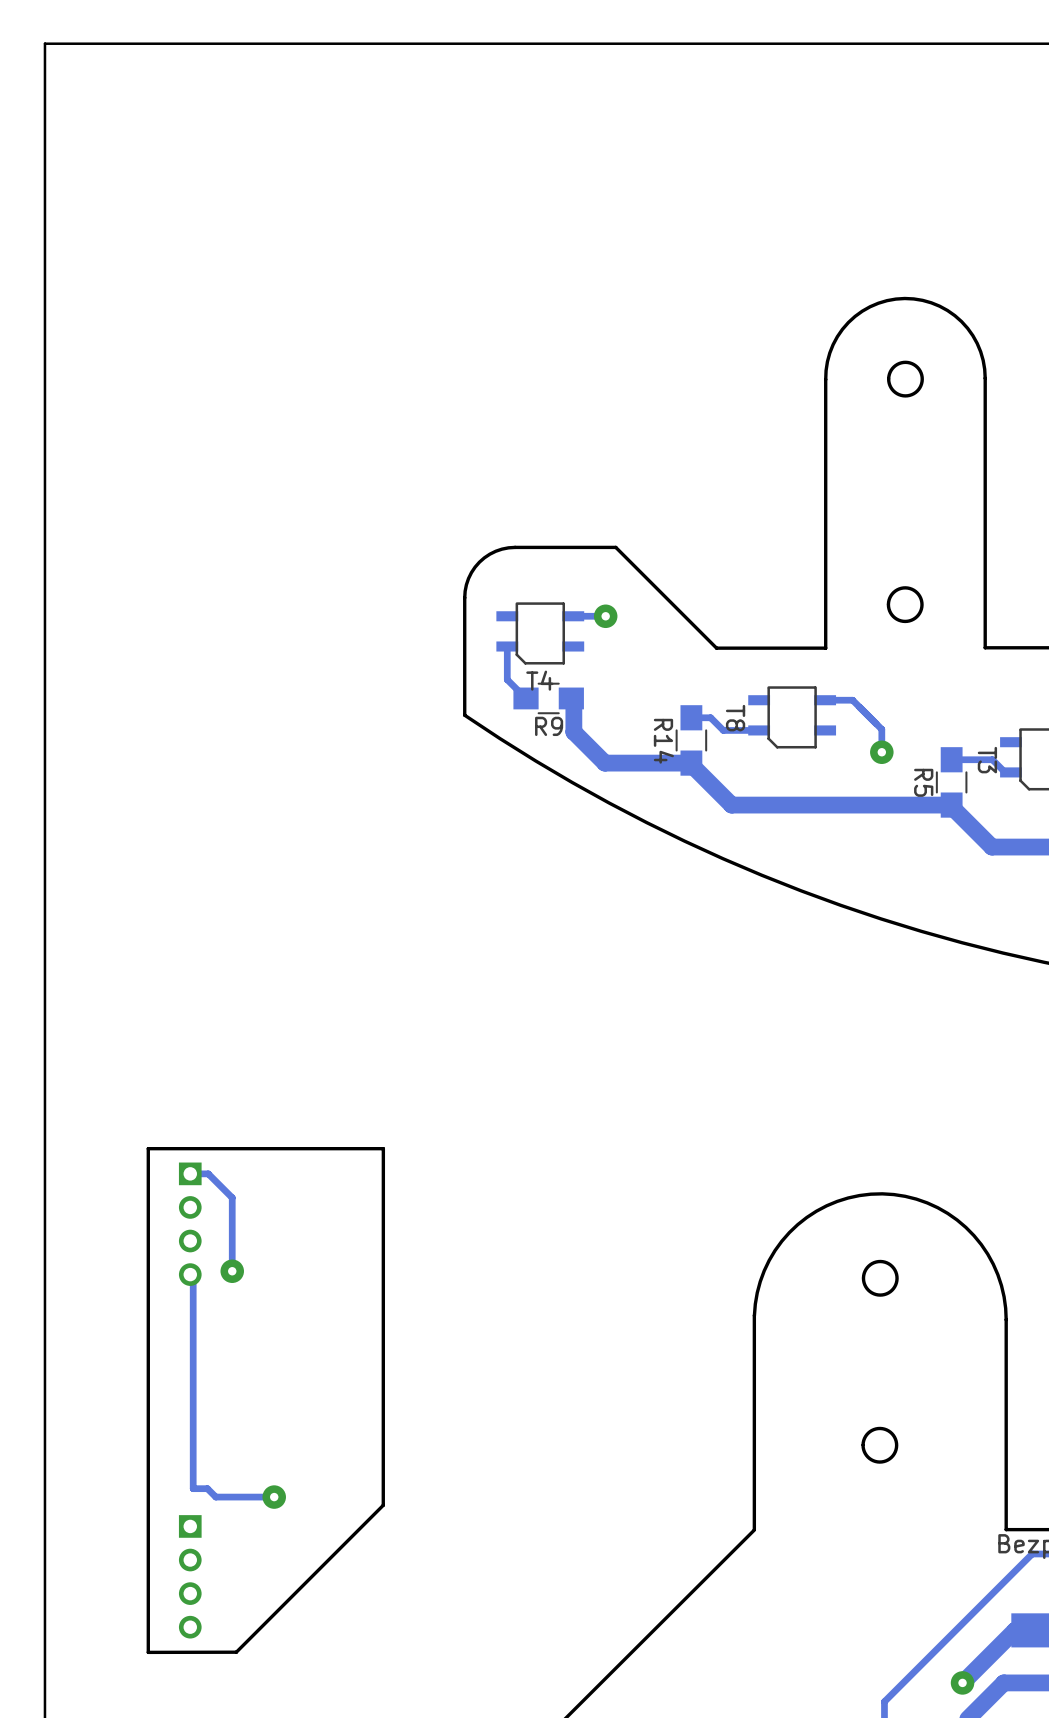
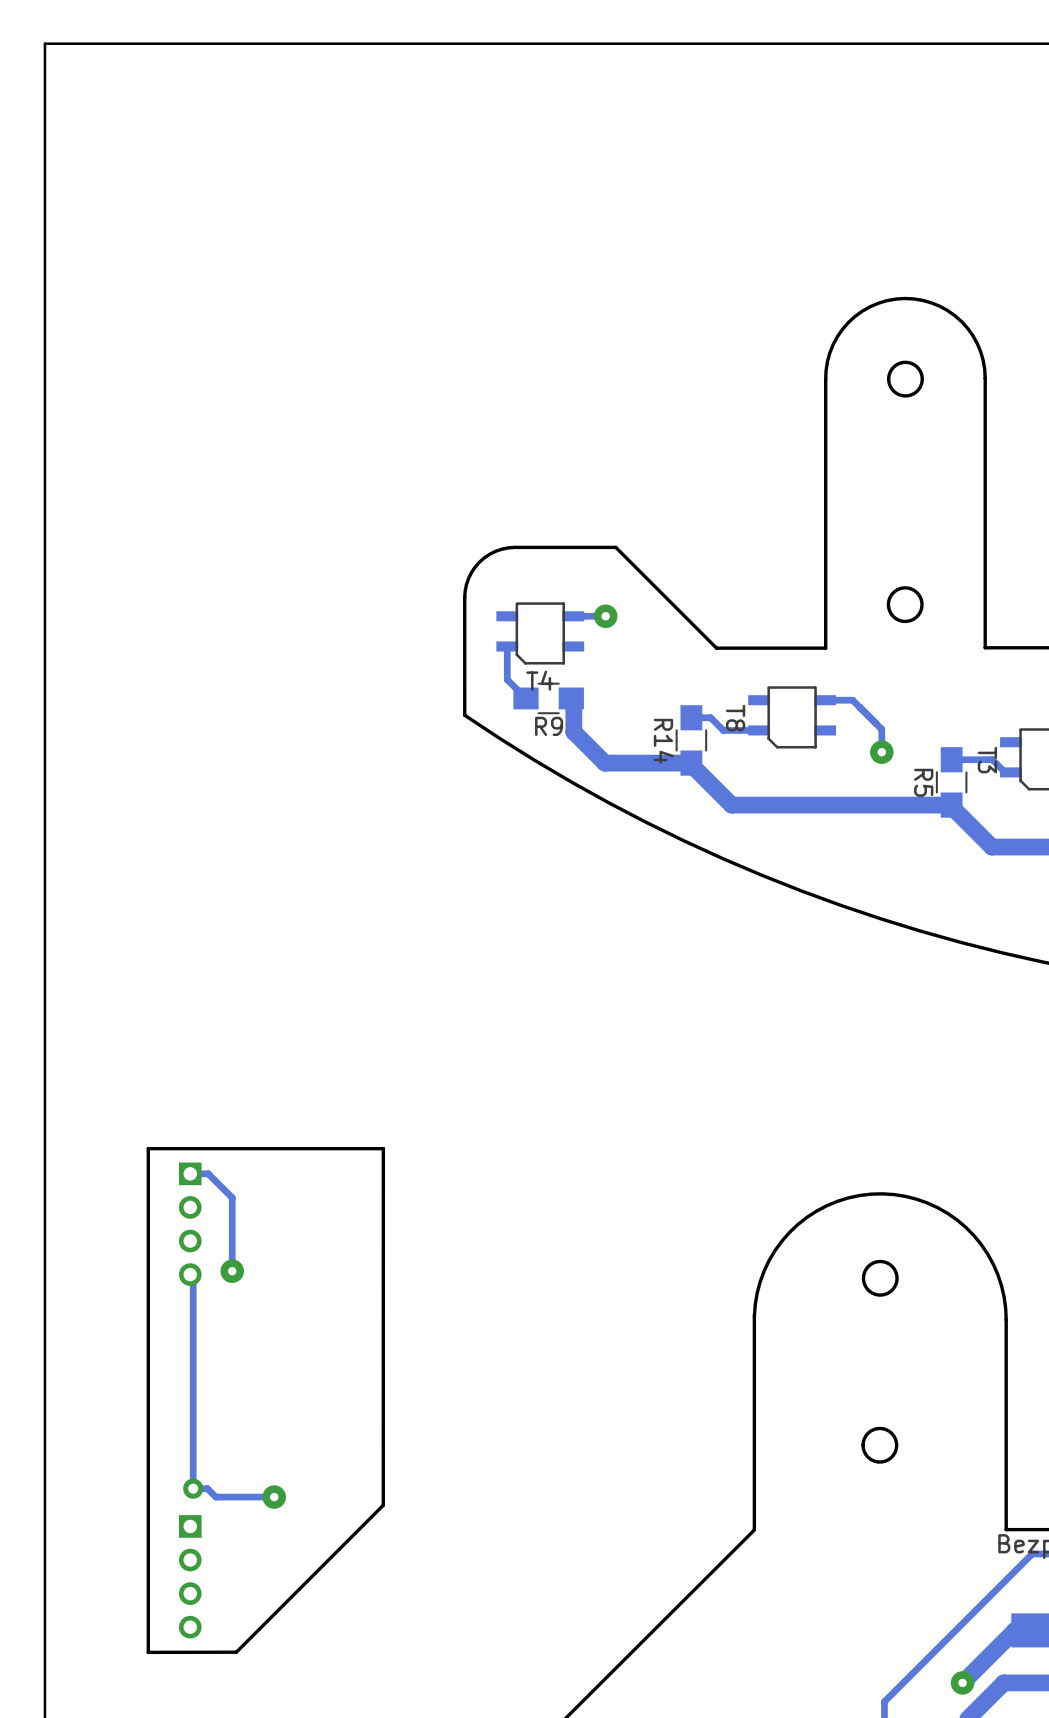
via: none -> (193, 1488)

